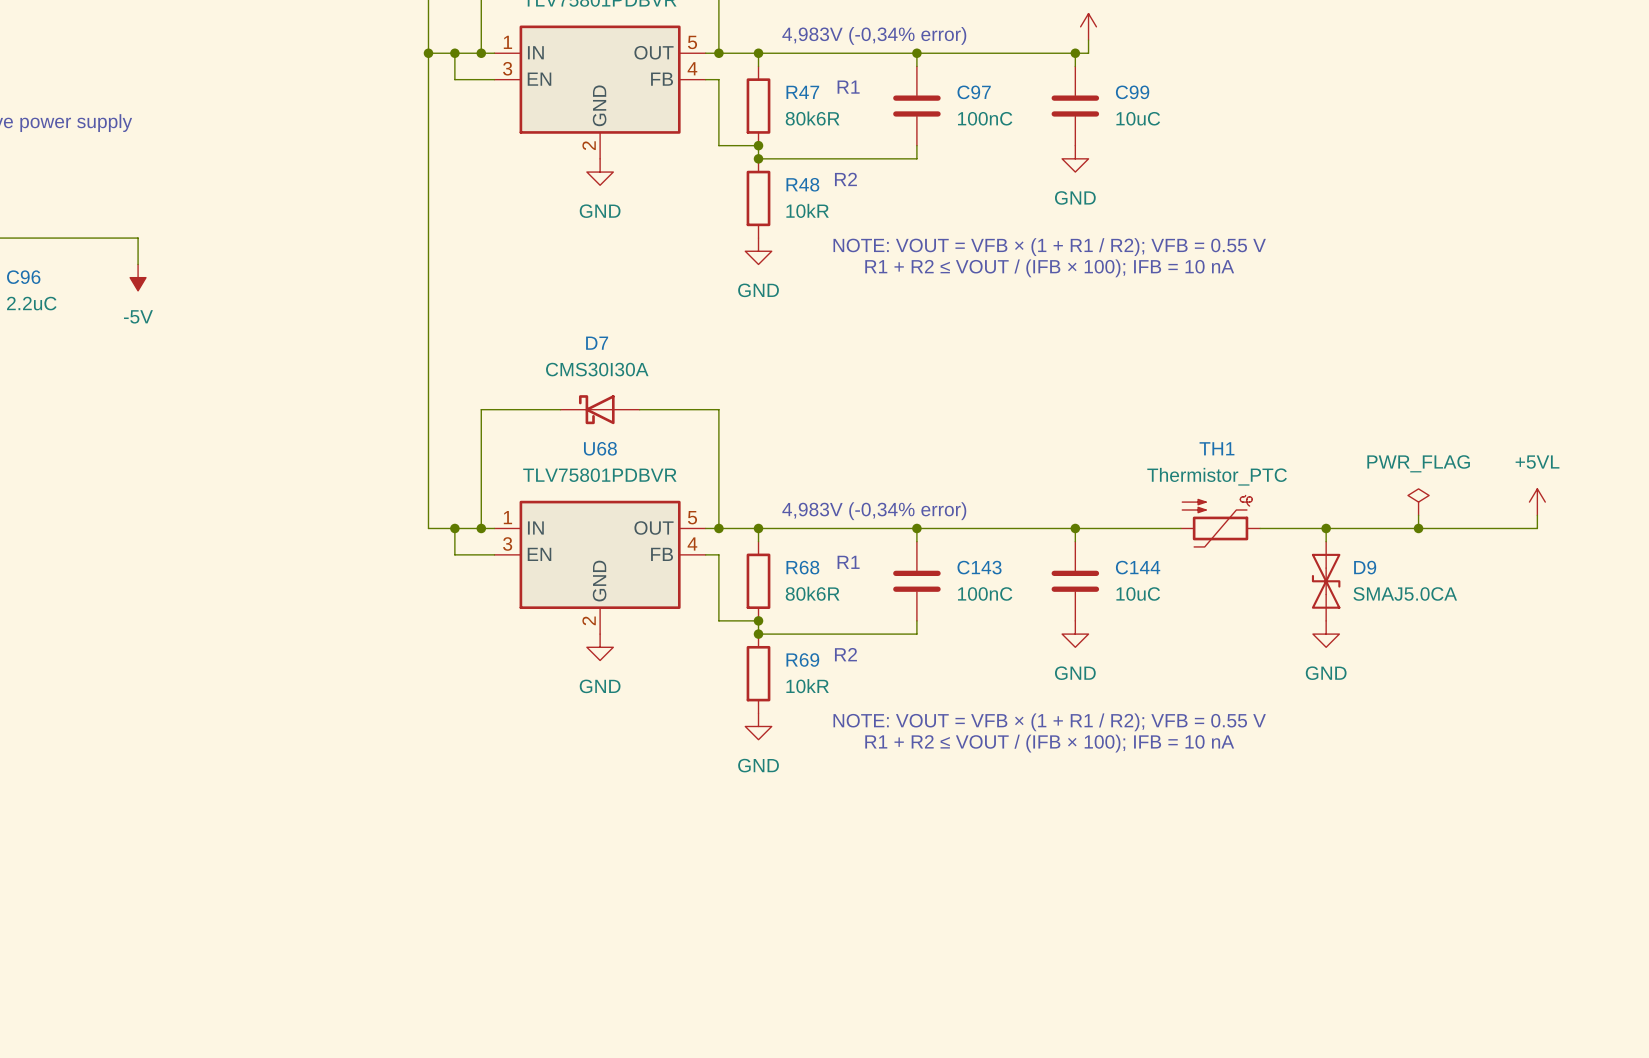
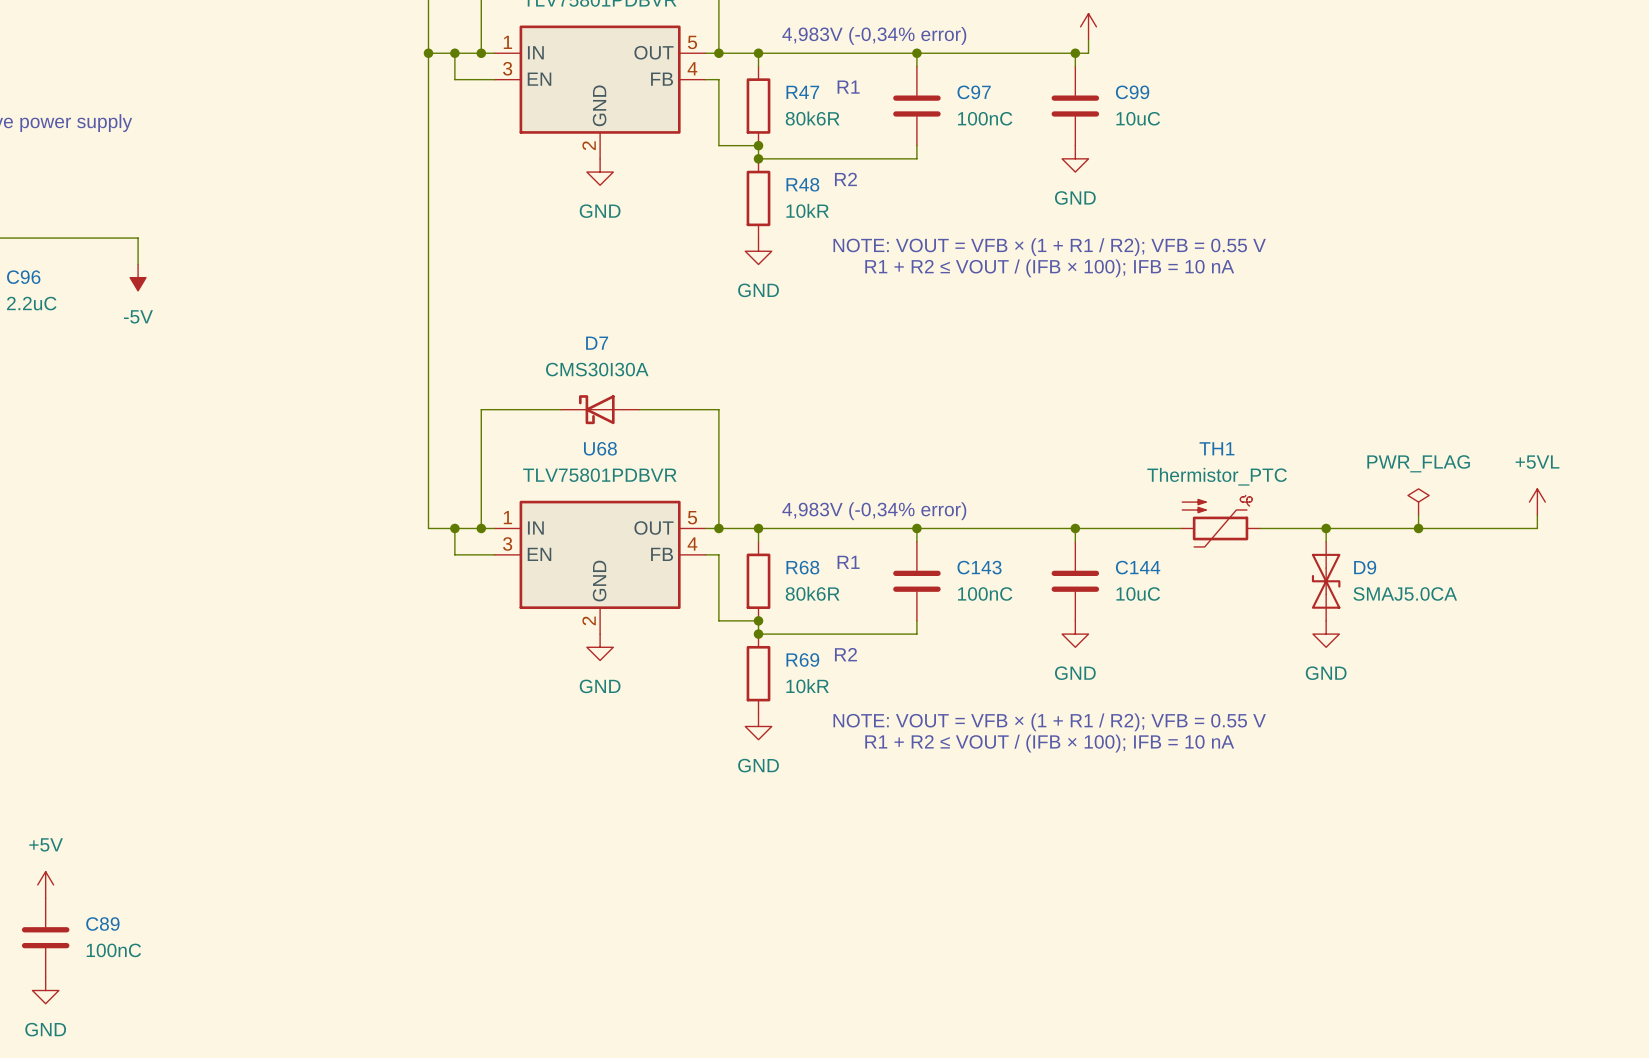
power symbol: none -> +5V (45, 884)
C89: none -> 100nC (45, 937)
power symbol: none -> GND (45, 990)

